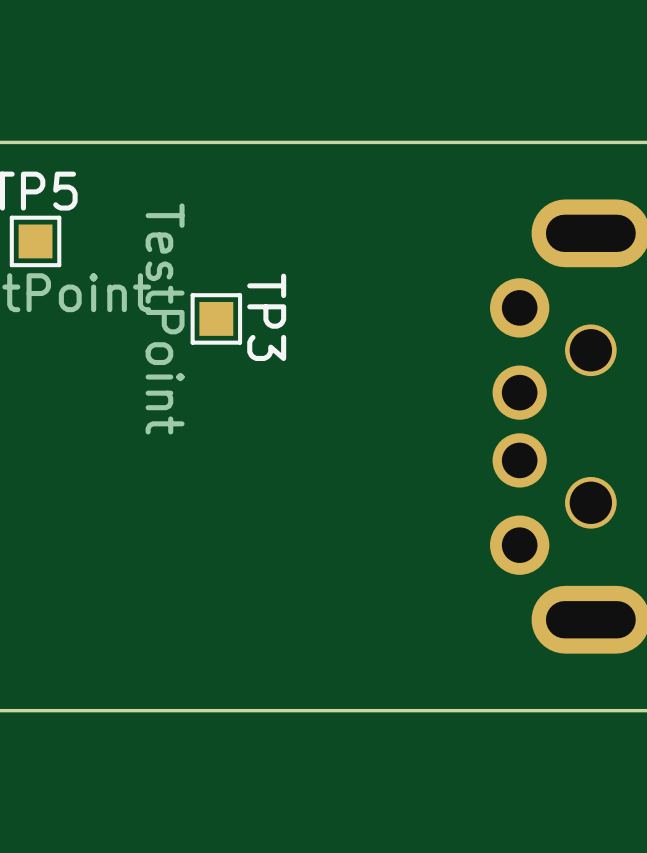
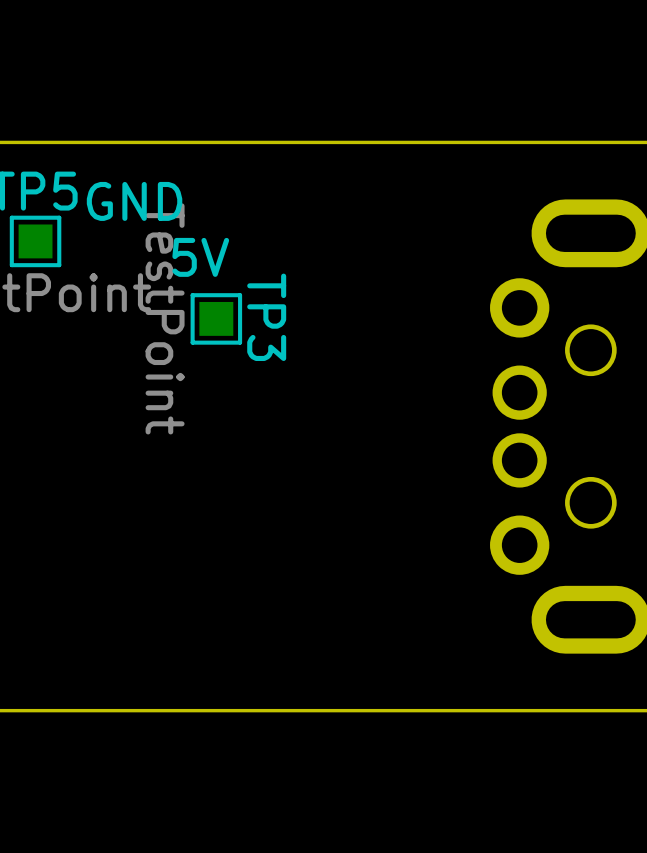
text: none -> GND (134, 201)
text: none -> 5V (200, 257)

